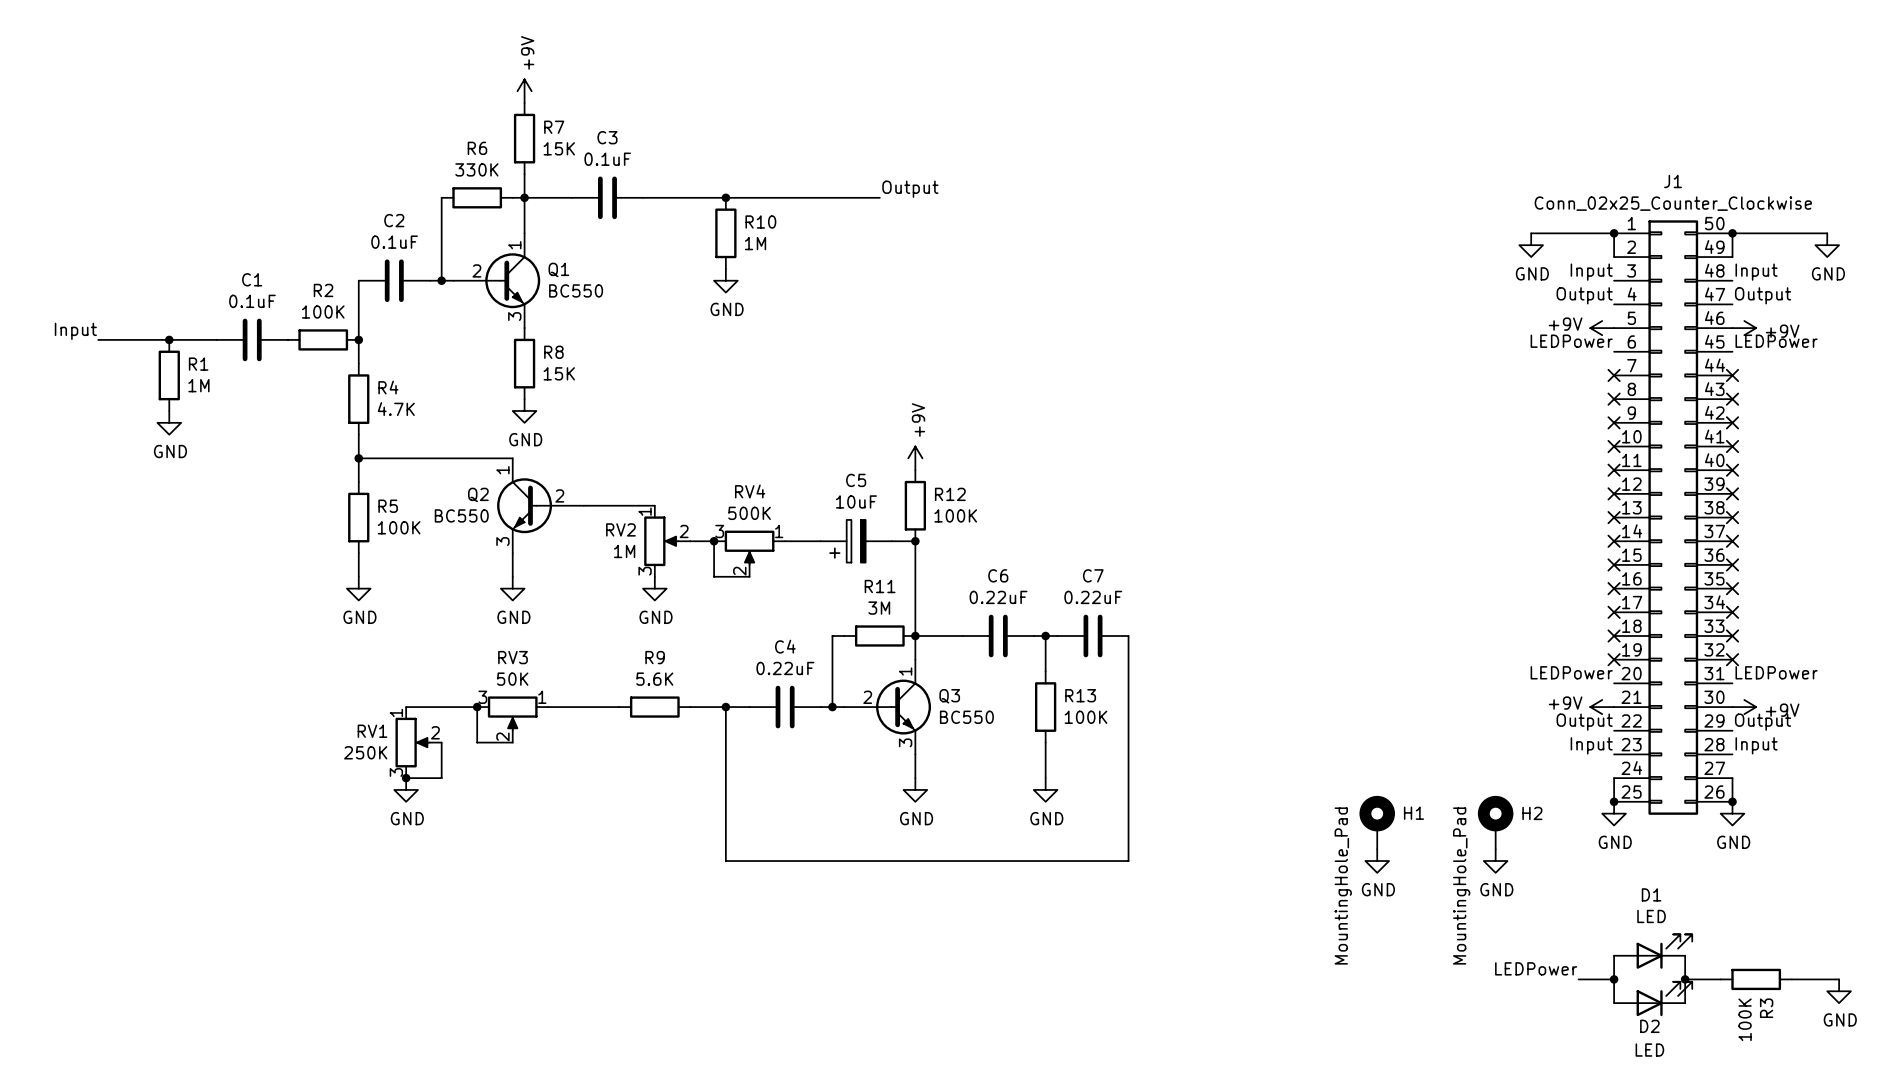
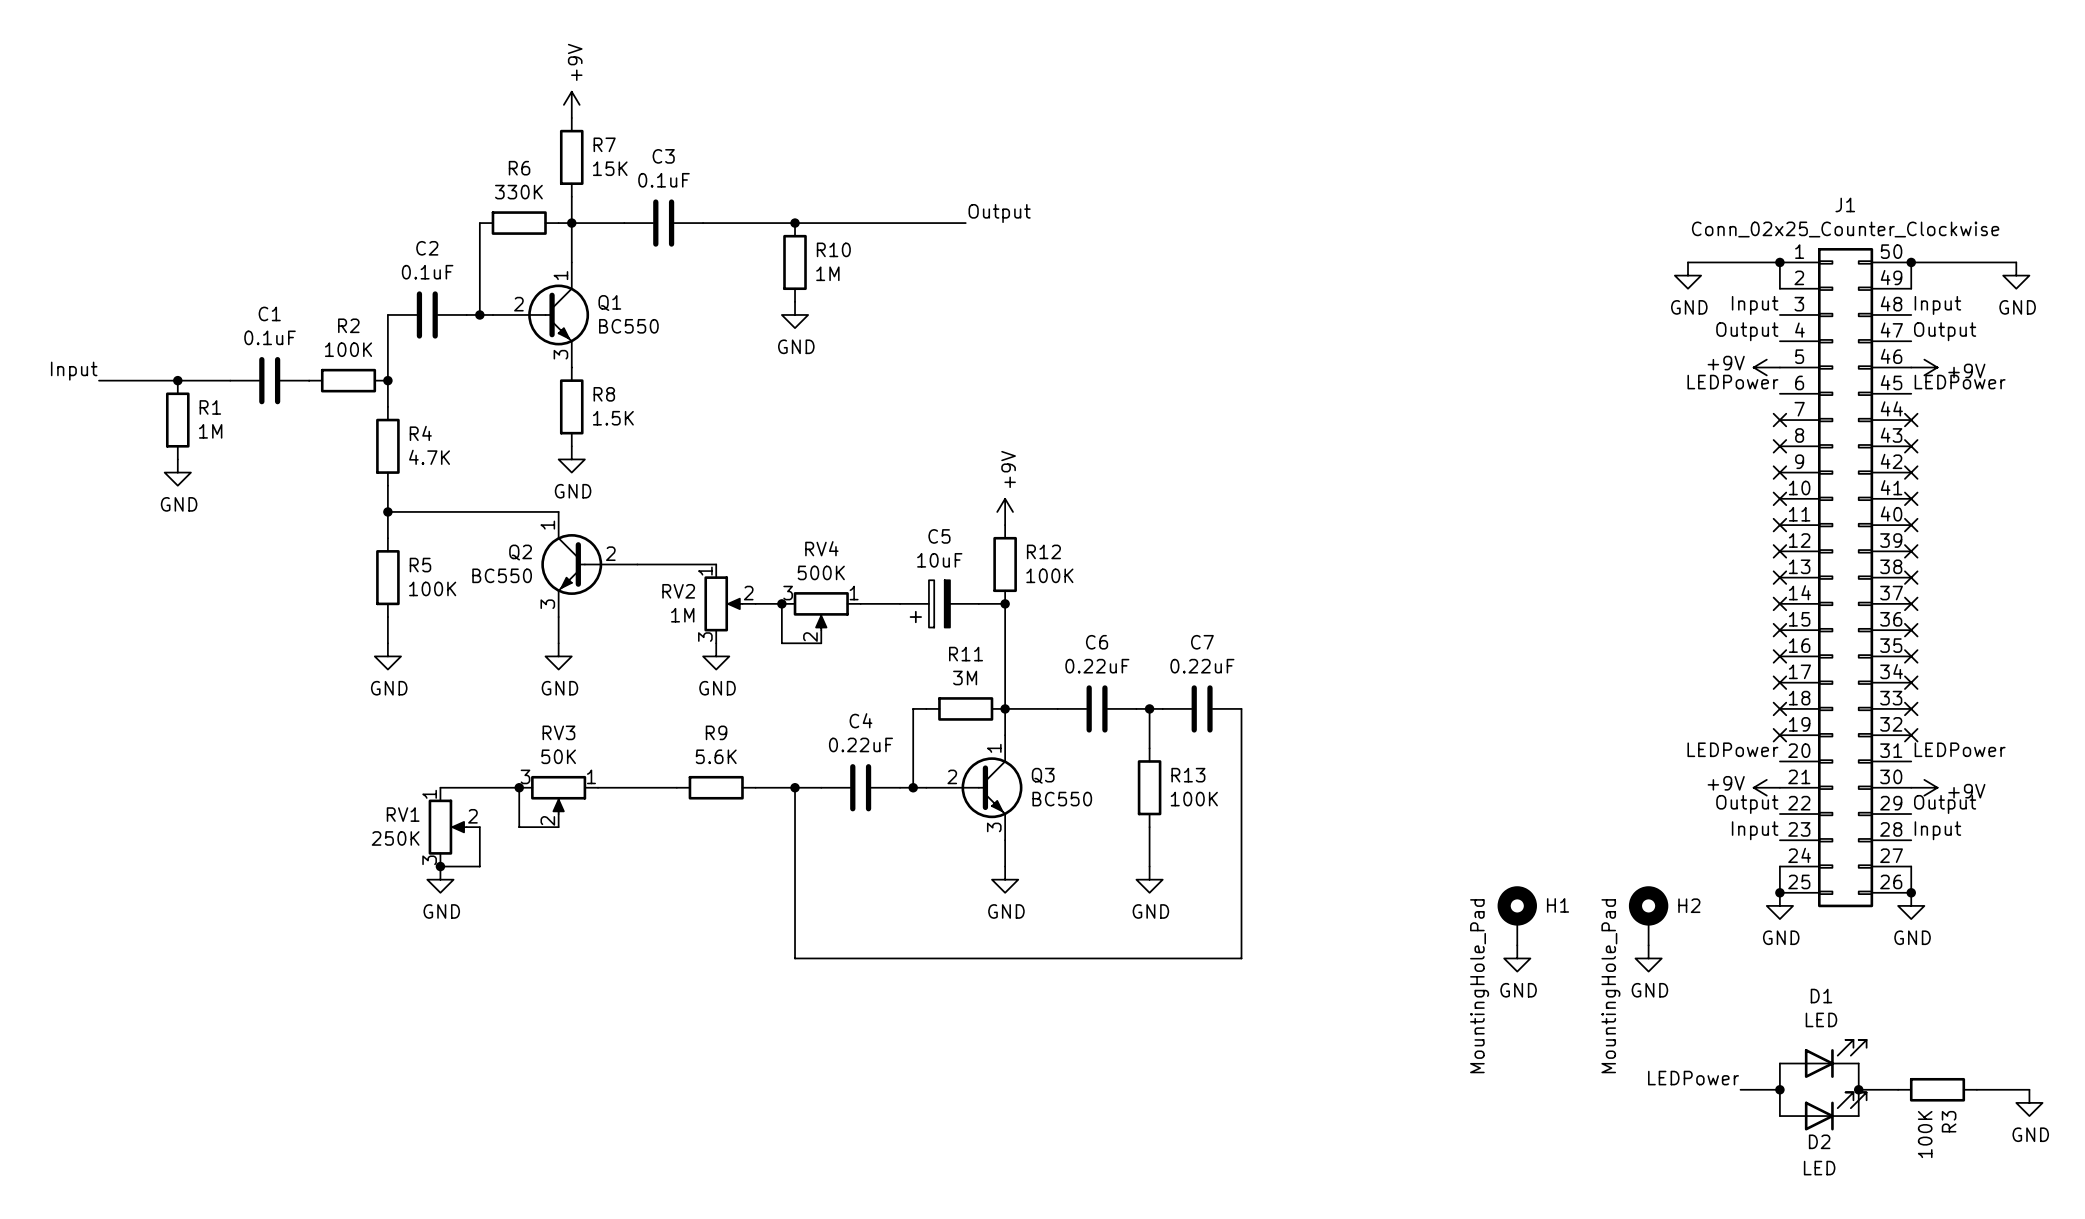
R8 value: 15K (559, 373) -> 1.5K (613, 418)

